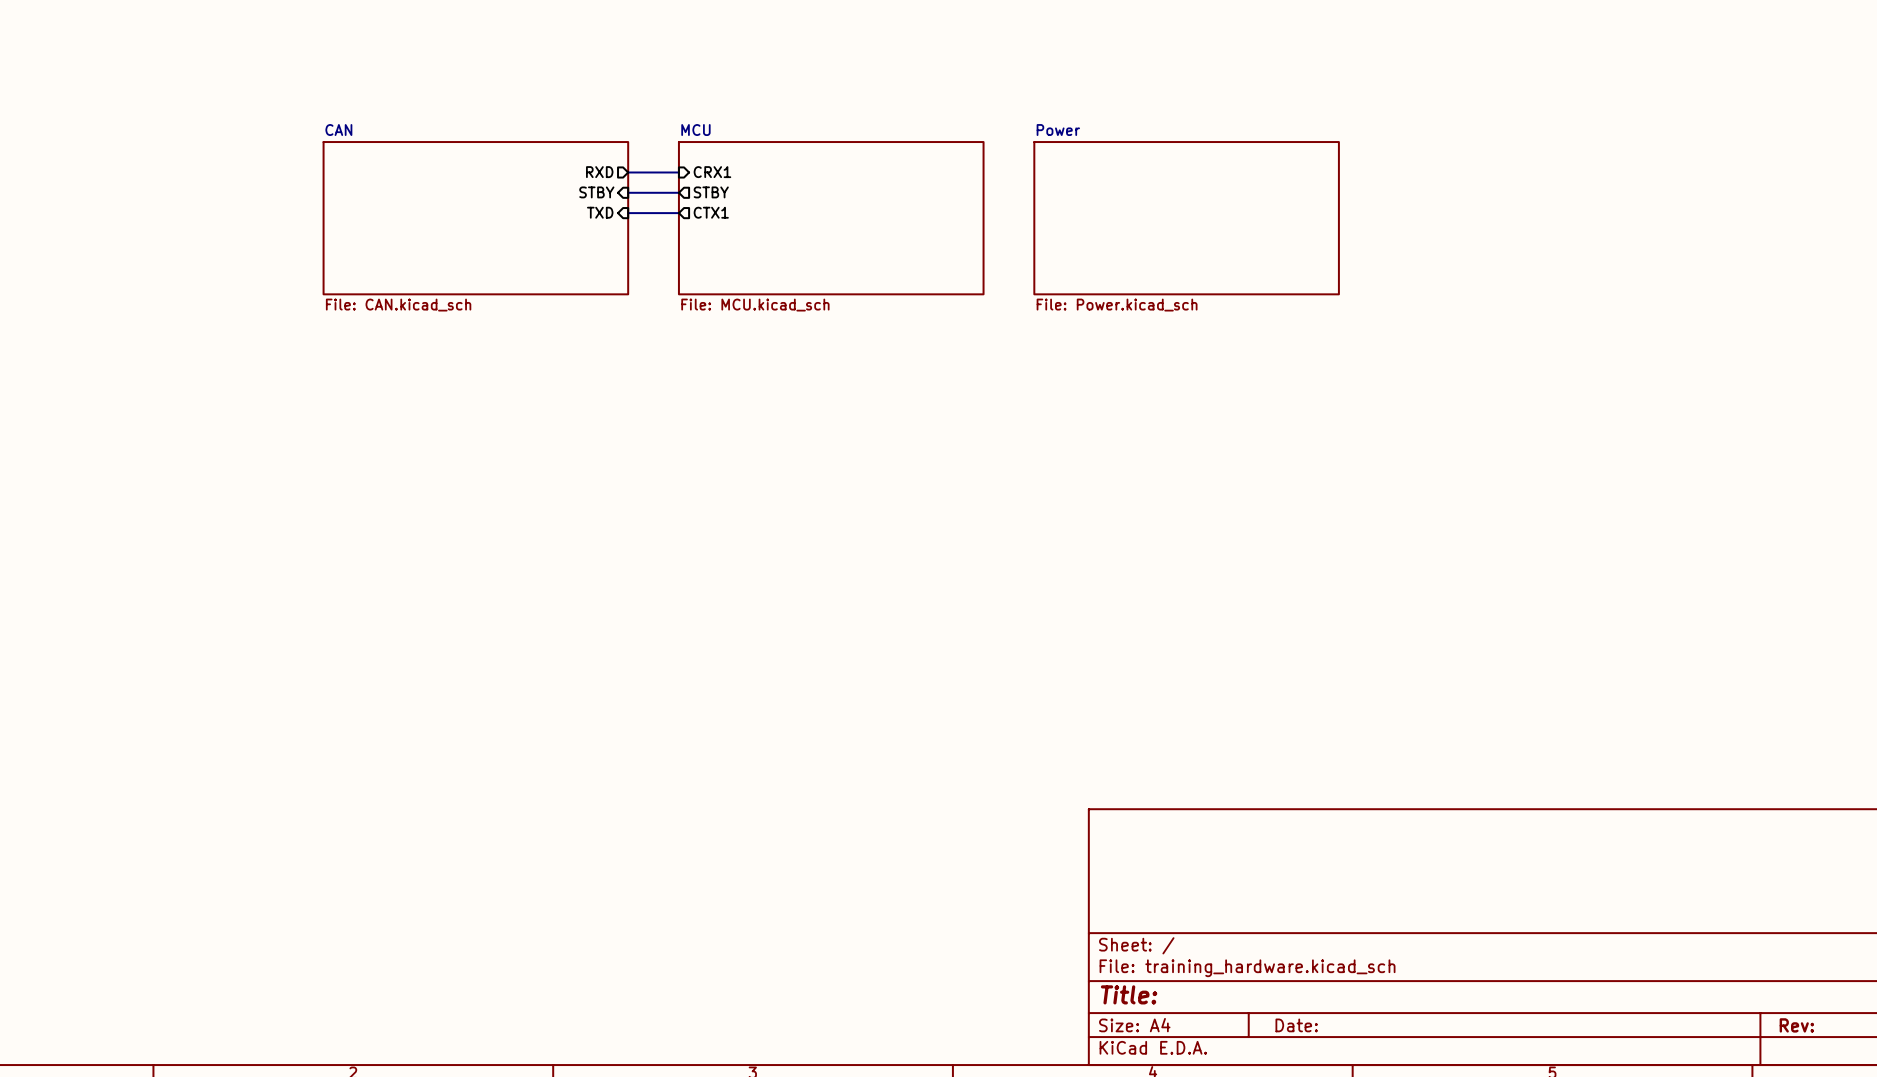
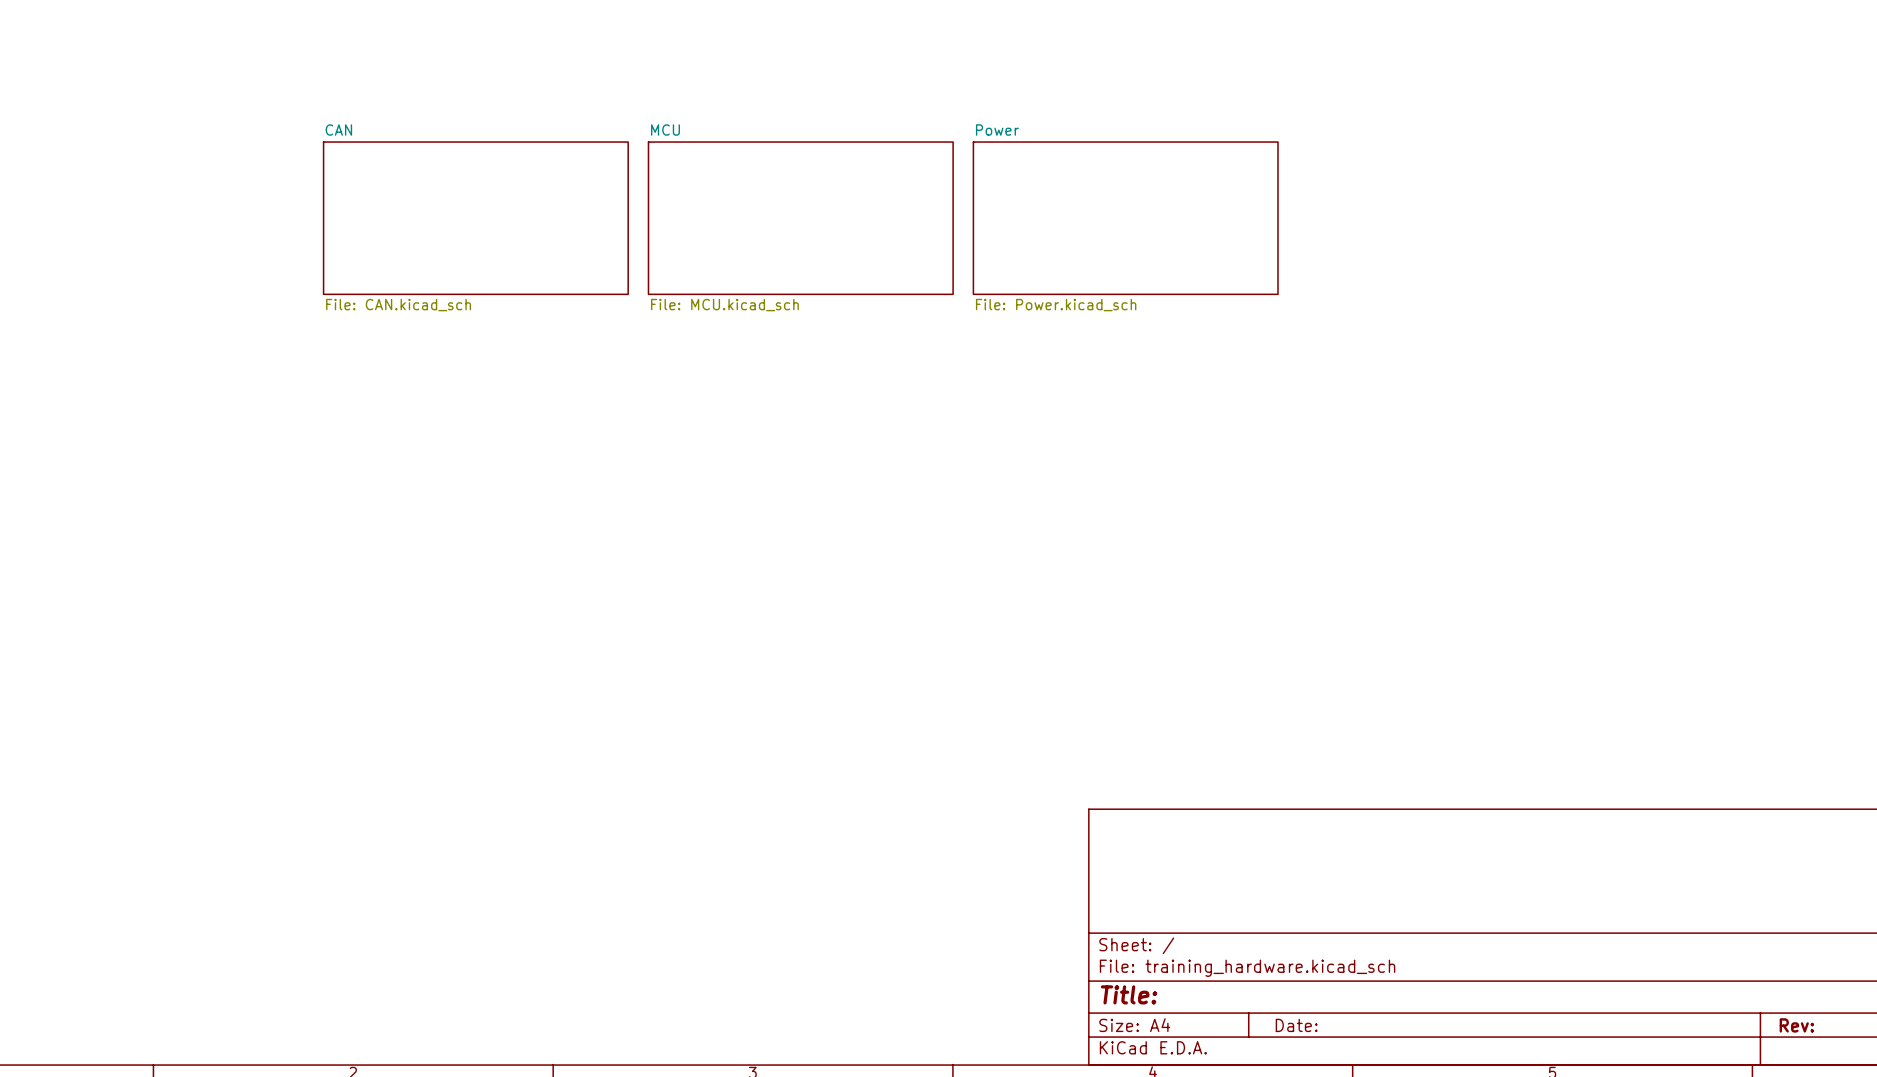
sheet pin: RXD (599, 172) -> none
wire: (628, 172) (678, 172) -> none
sheet pin: CRX1 (712, 172) -> none
sheet pin: STBY (596, 192) -> none
wire: (628, 192) (678, 192) -> none
sheet pin: STBY (711, 192) -> none
sheet pin: TXD (600, 212) -> none
sheet pin: CTX1 (711, 212) -> none
wire: (628, 213) (678, 213) -> none
sheet MCU position: (831, 218) -> (800, 218)
sheet Power position: (1186, 218) -> (1125, 218)

